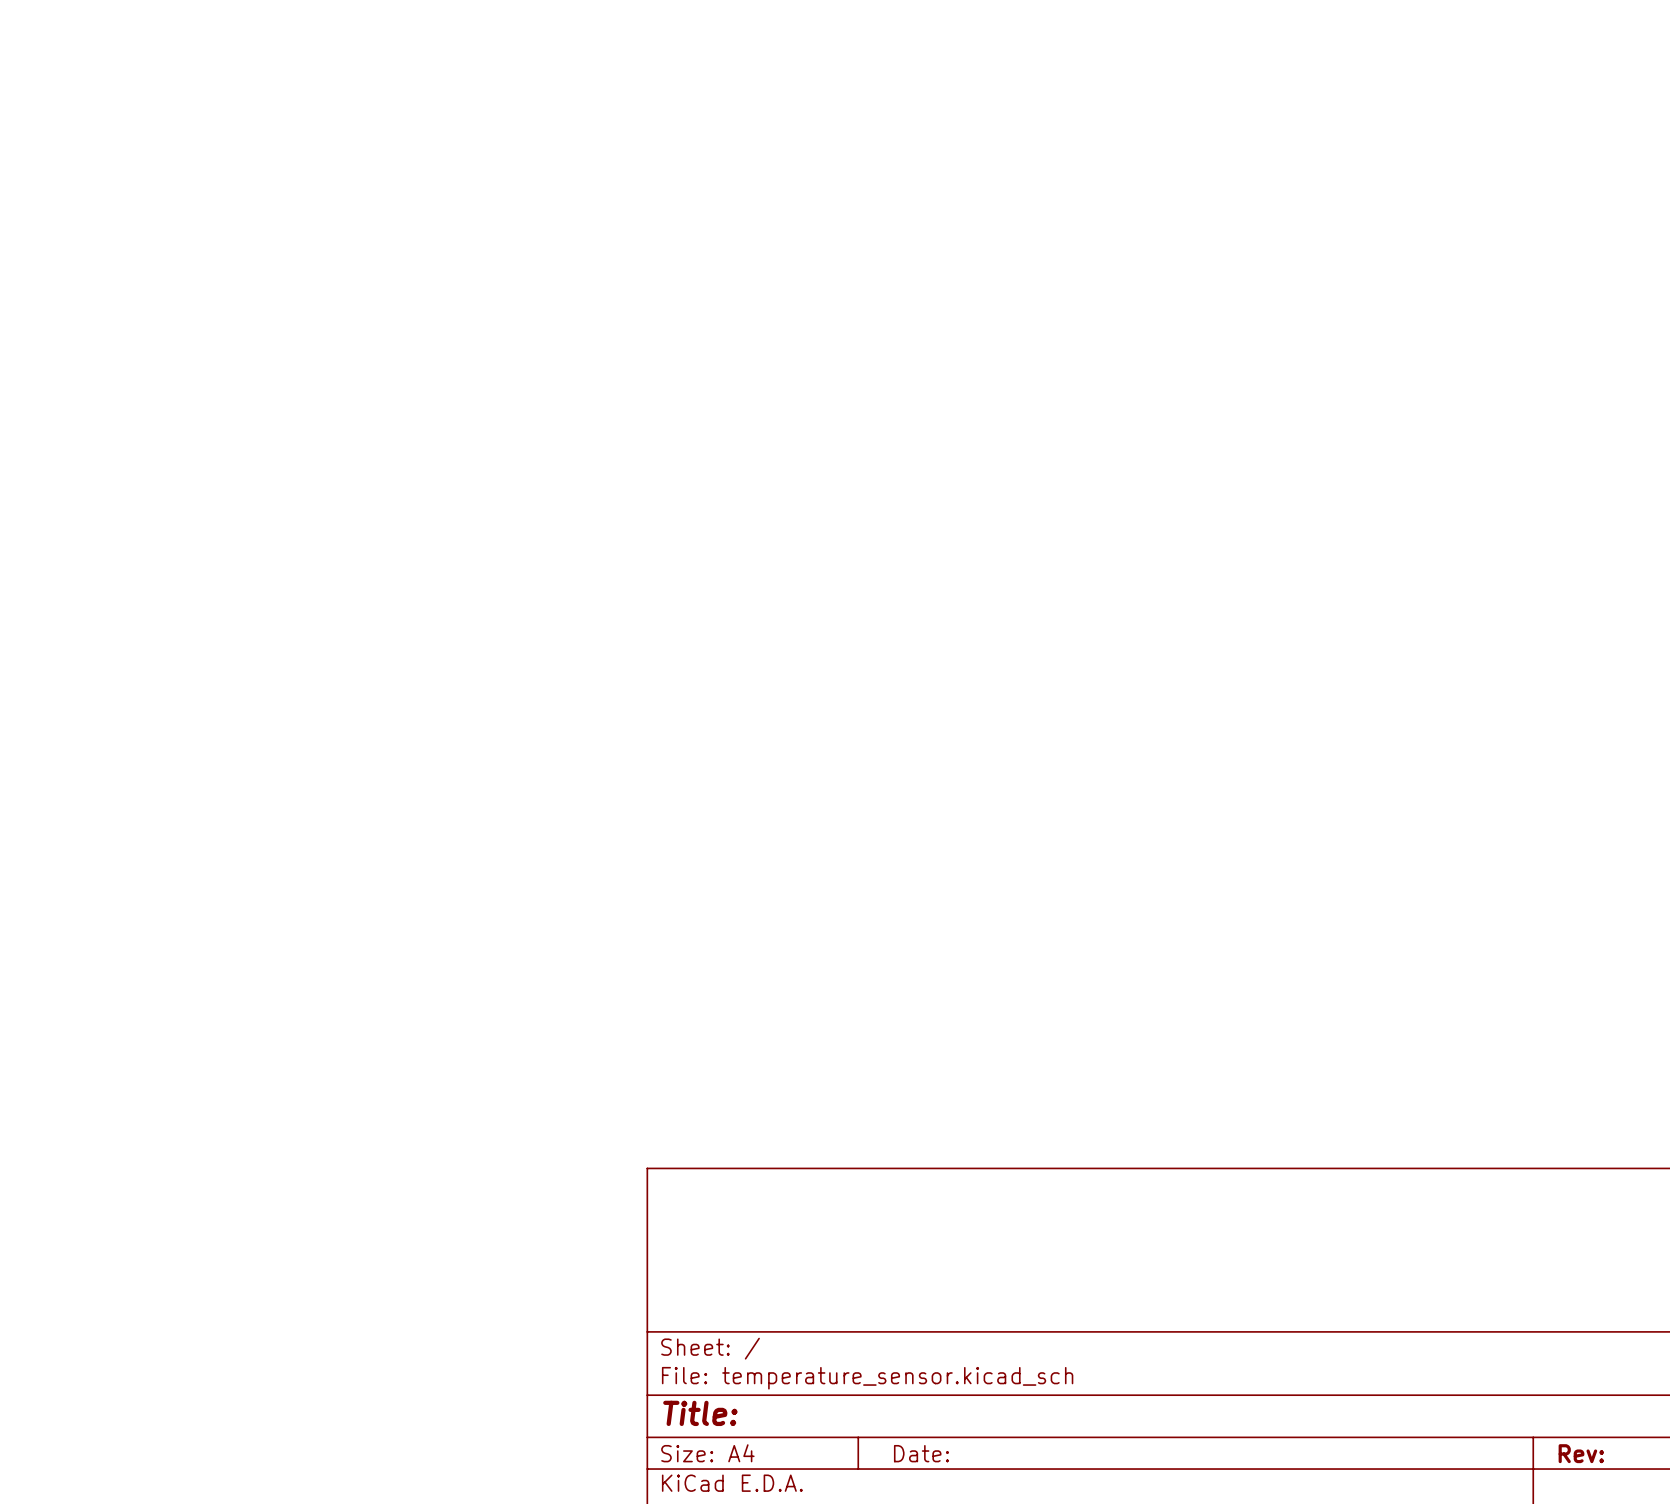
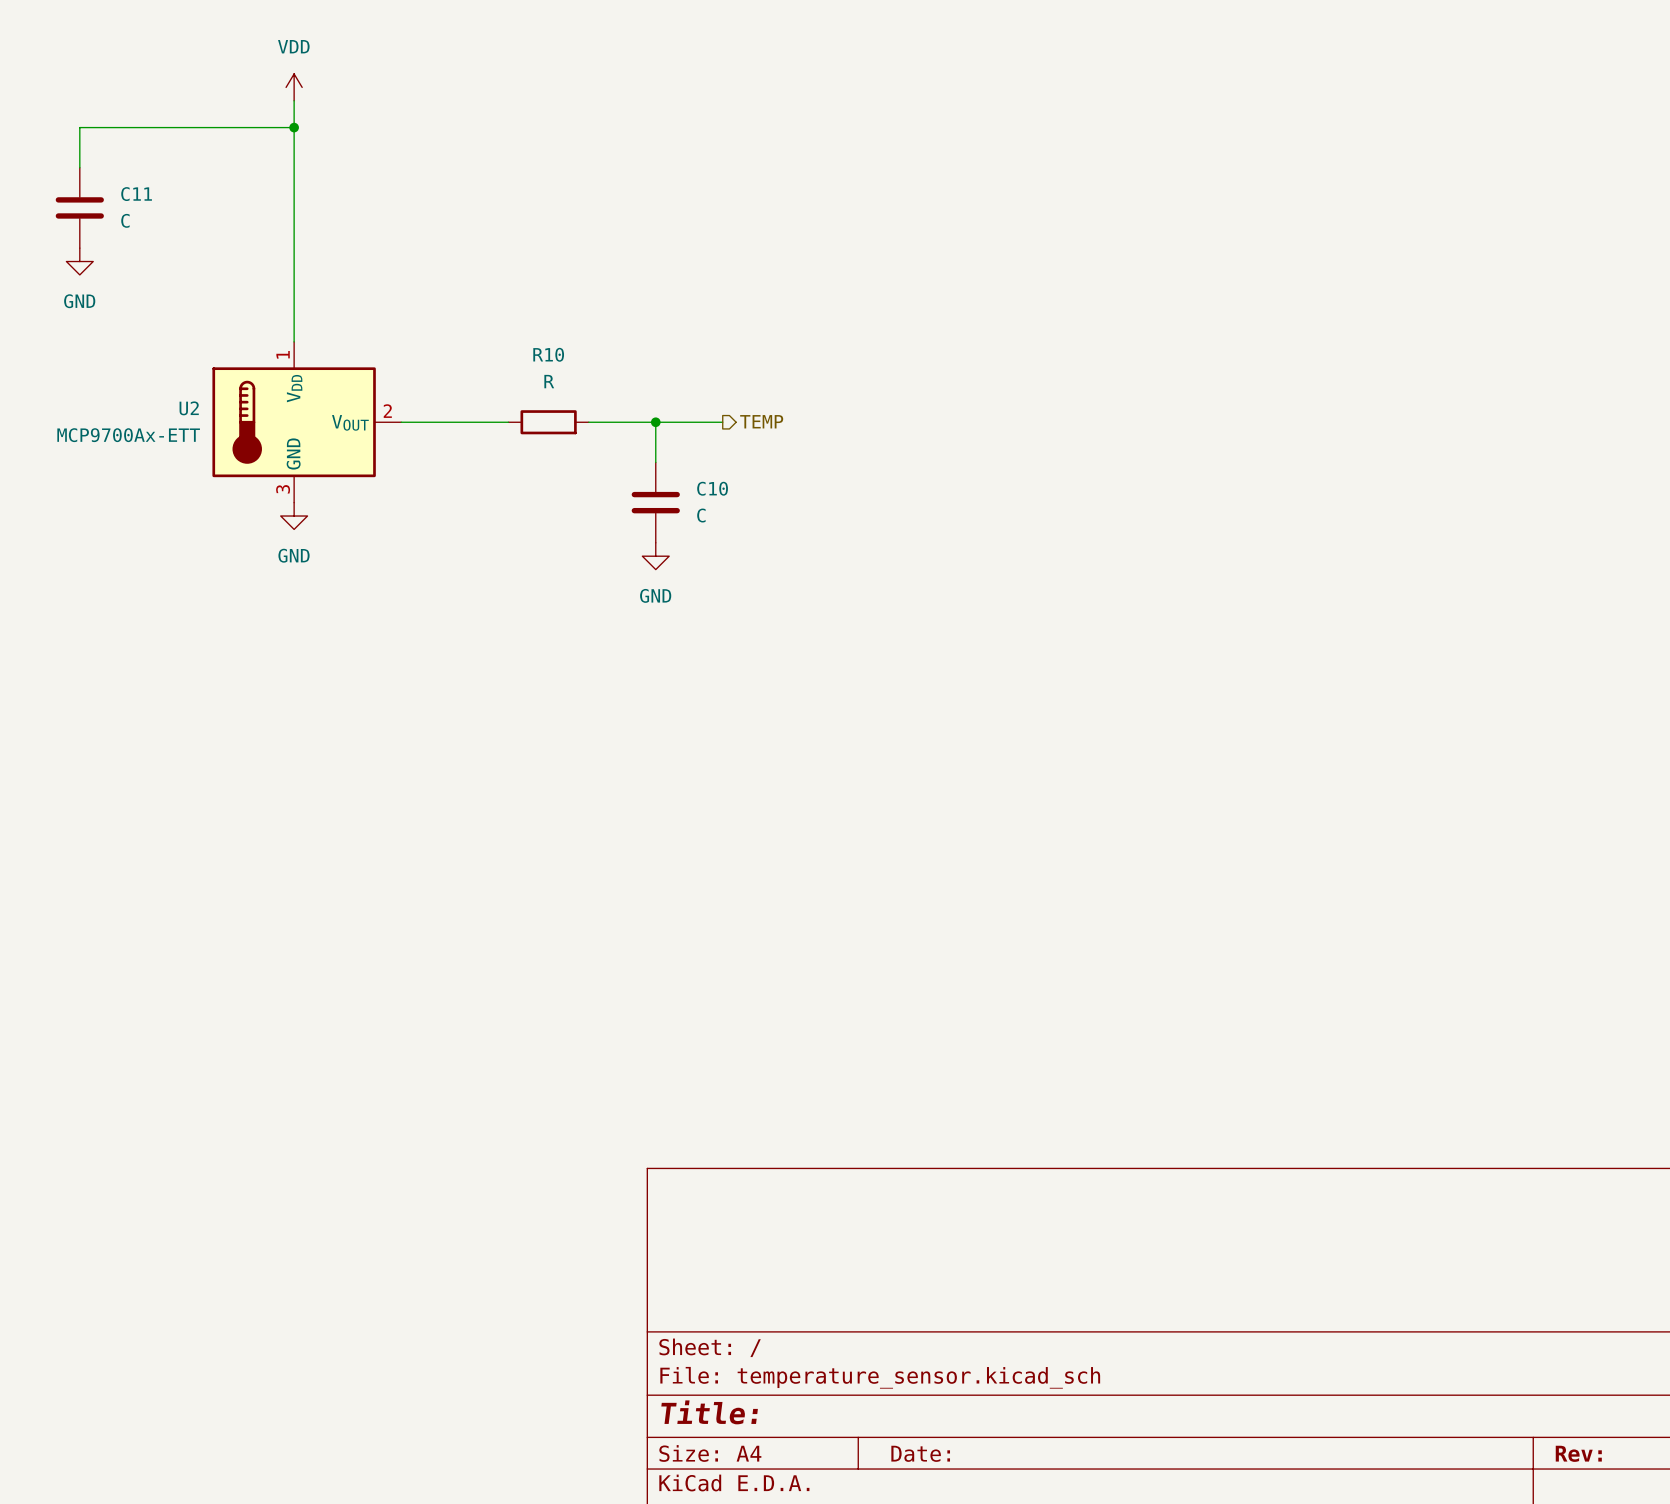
power symbol: none -> VDD (294, 87)
wire: none -> (294, 100) (294, 341)
wire: none -> (294, 127) (79, 127) (79, 167)
junction: none -> (294, 127)
C11: none -> C (79, 207)
power symbol: none -> GND (79, 261)
hierarchical label: none -> TEMP (761, 421)
U2: none -> MCP9700Ax-ETT (306, 422)
wire: none -> (401, 422) (508, 422)
R10: none -> R (548, 422)
wire: none -> (588, 422) (722, 422)
wire: none -> (655, 422) (655, 462)
junction: none -> (655, 422)
C10: none -> C (655, 502)
power symbol: none -> GND (294, 516)
power symbol: none -> GND (655, 556)

